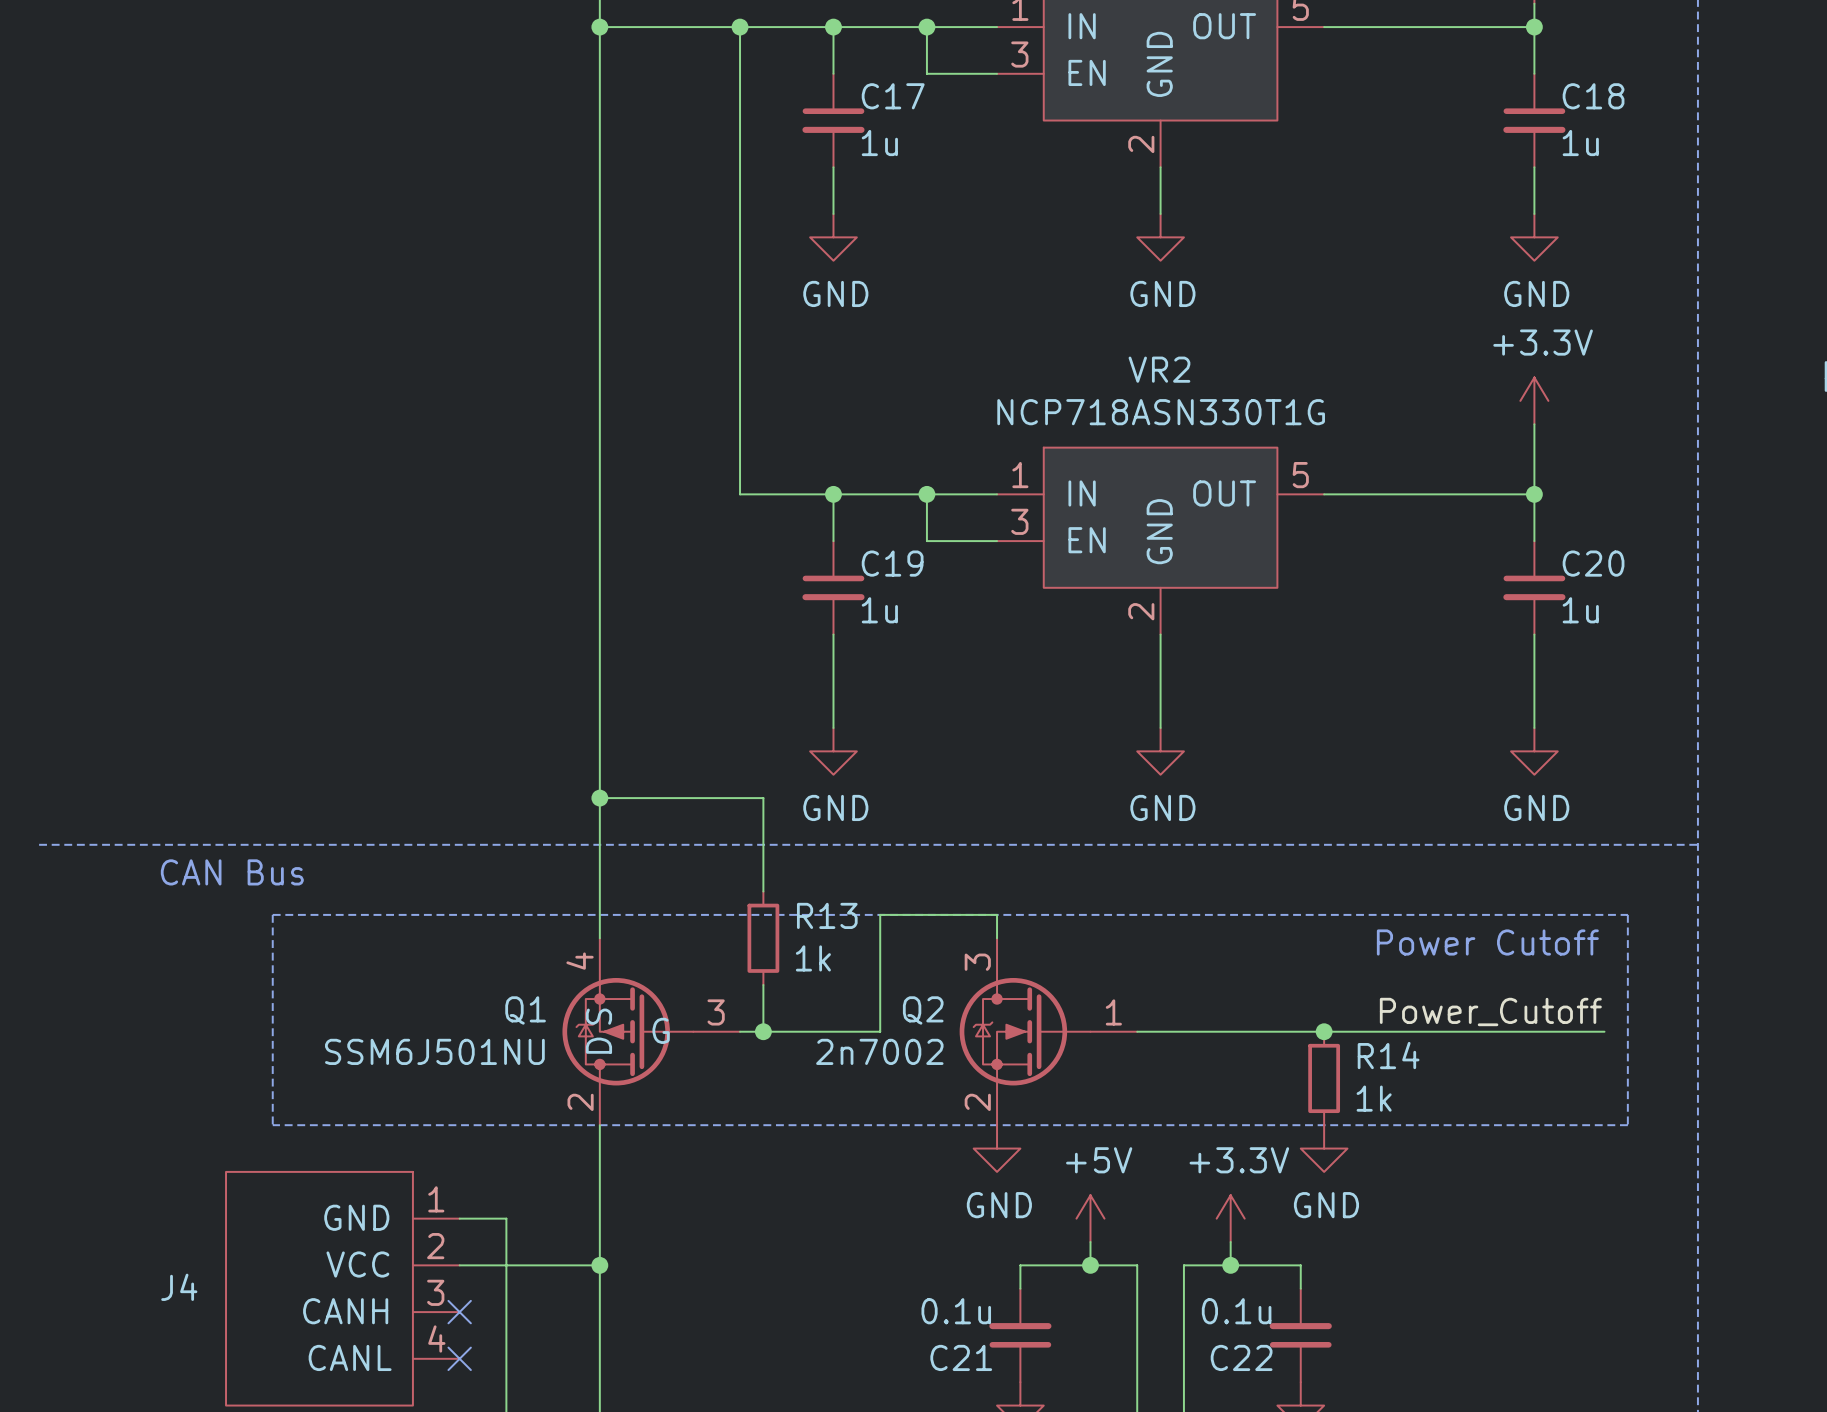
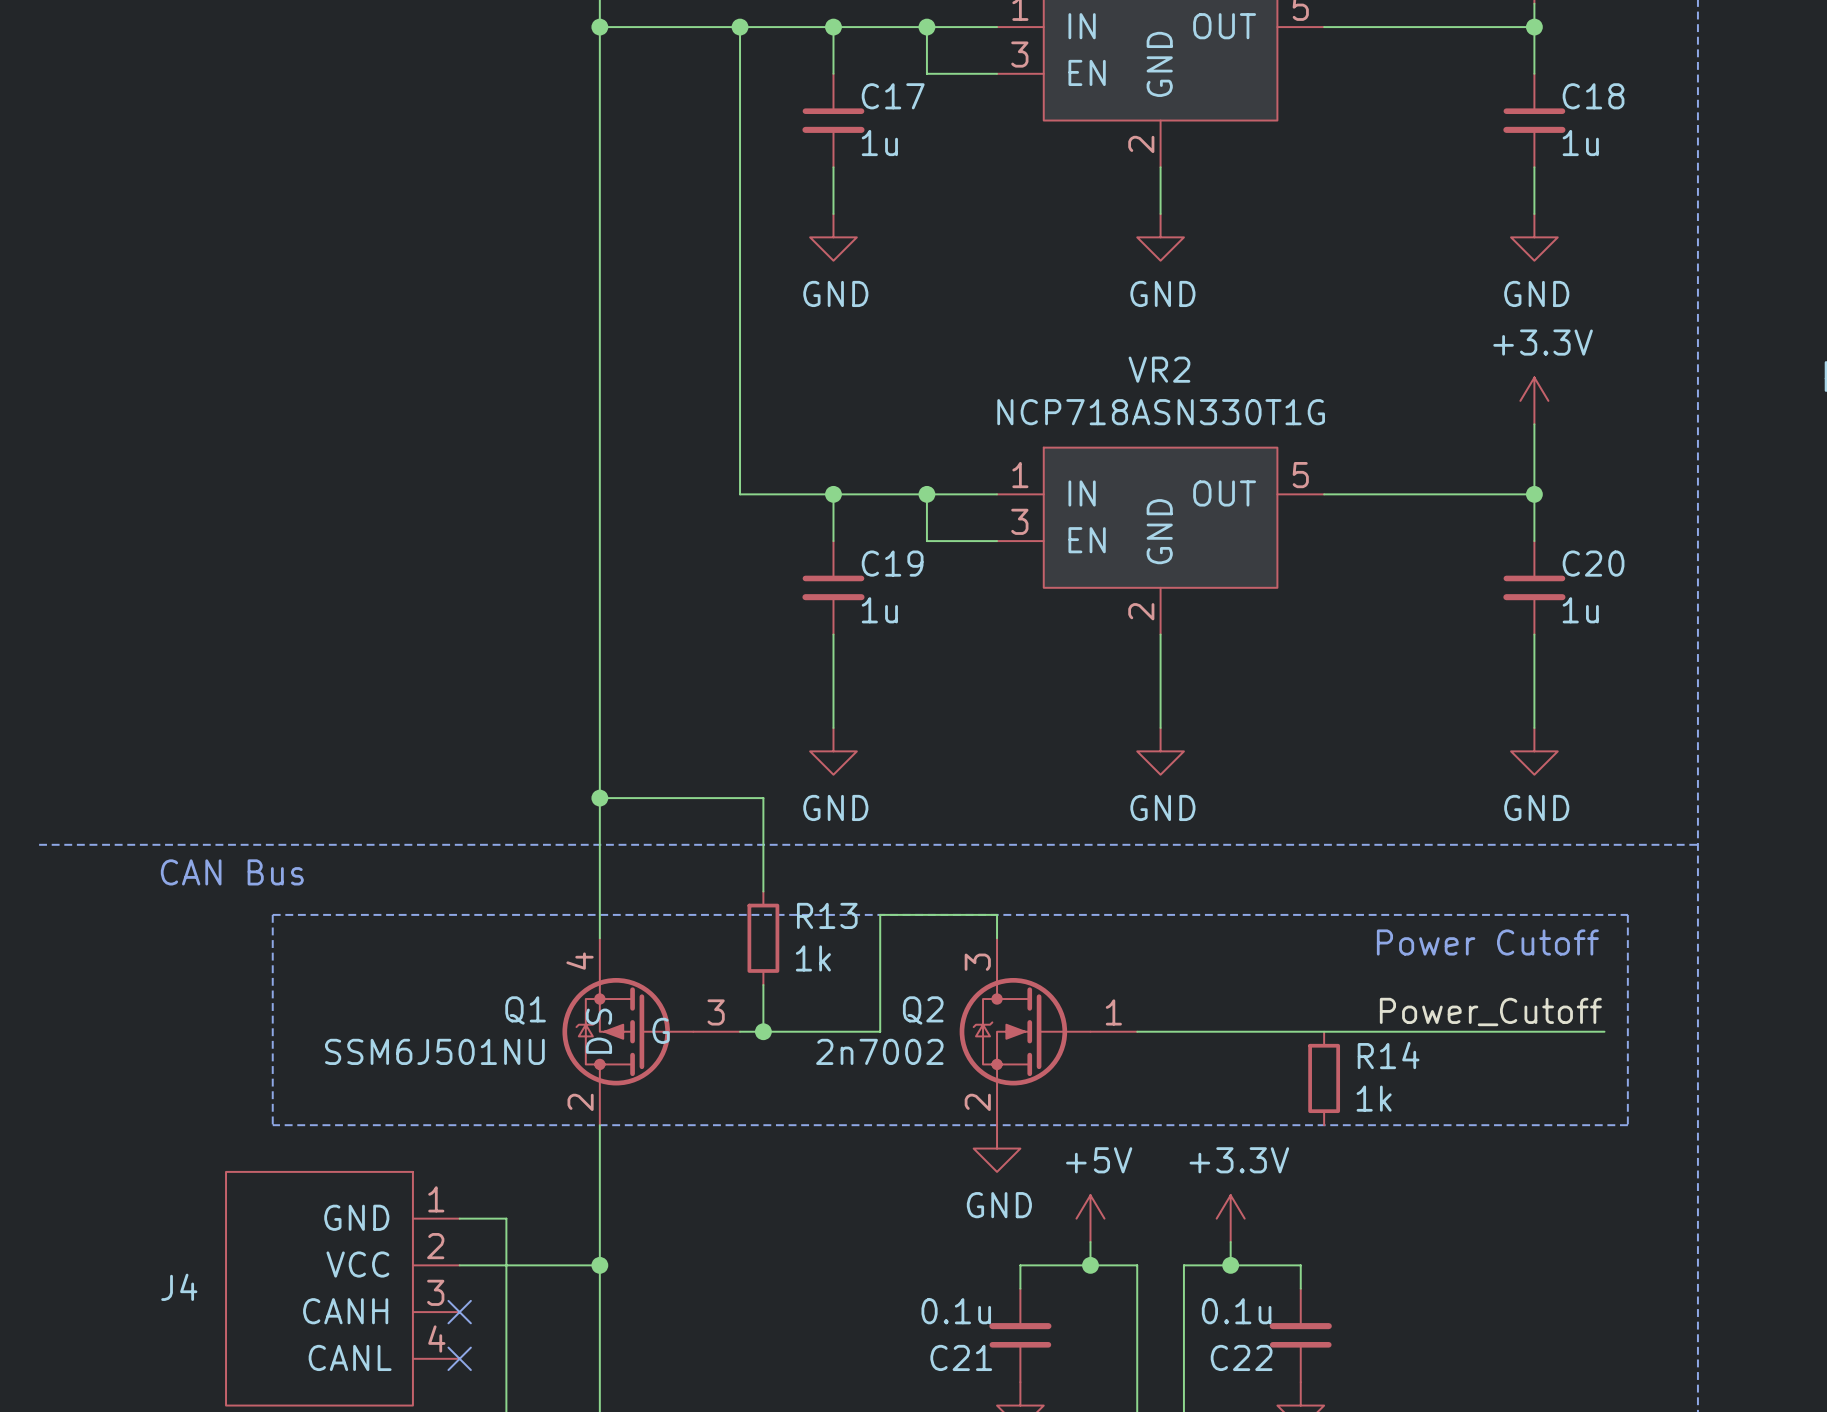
junction: (1324, 1031) -> none
power symbol: GND (1324, 1148) -> none

